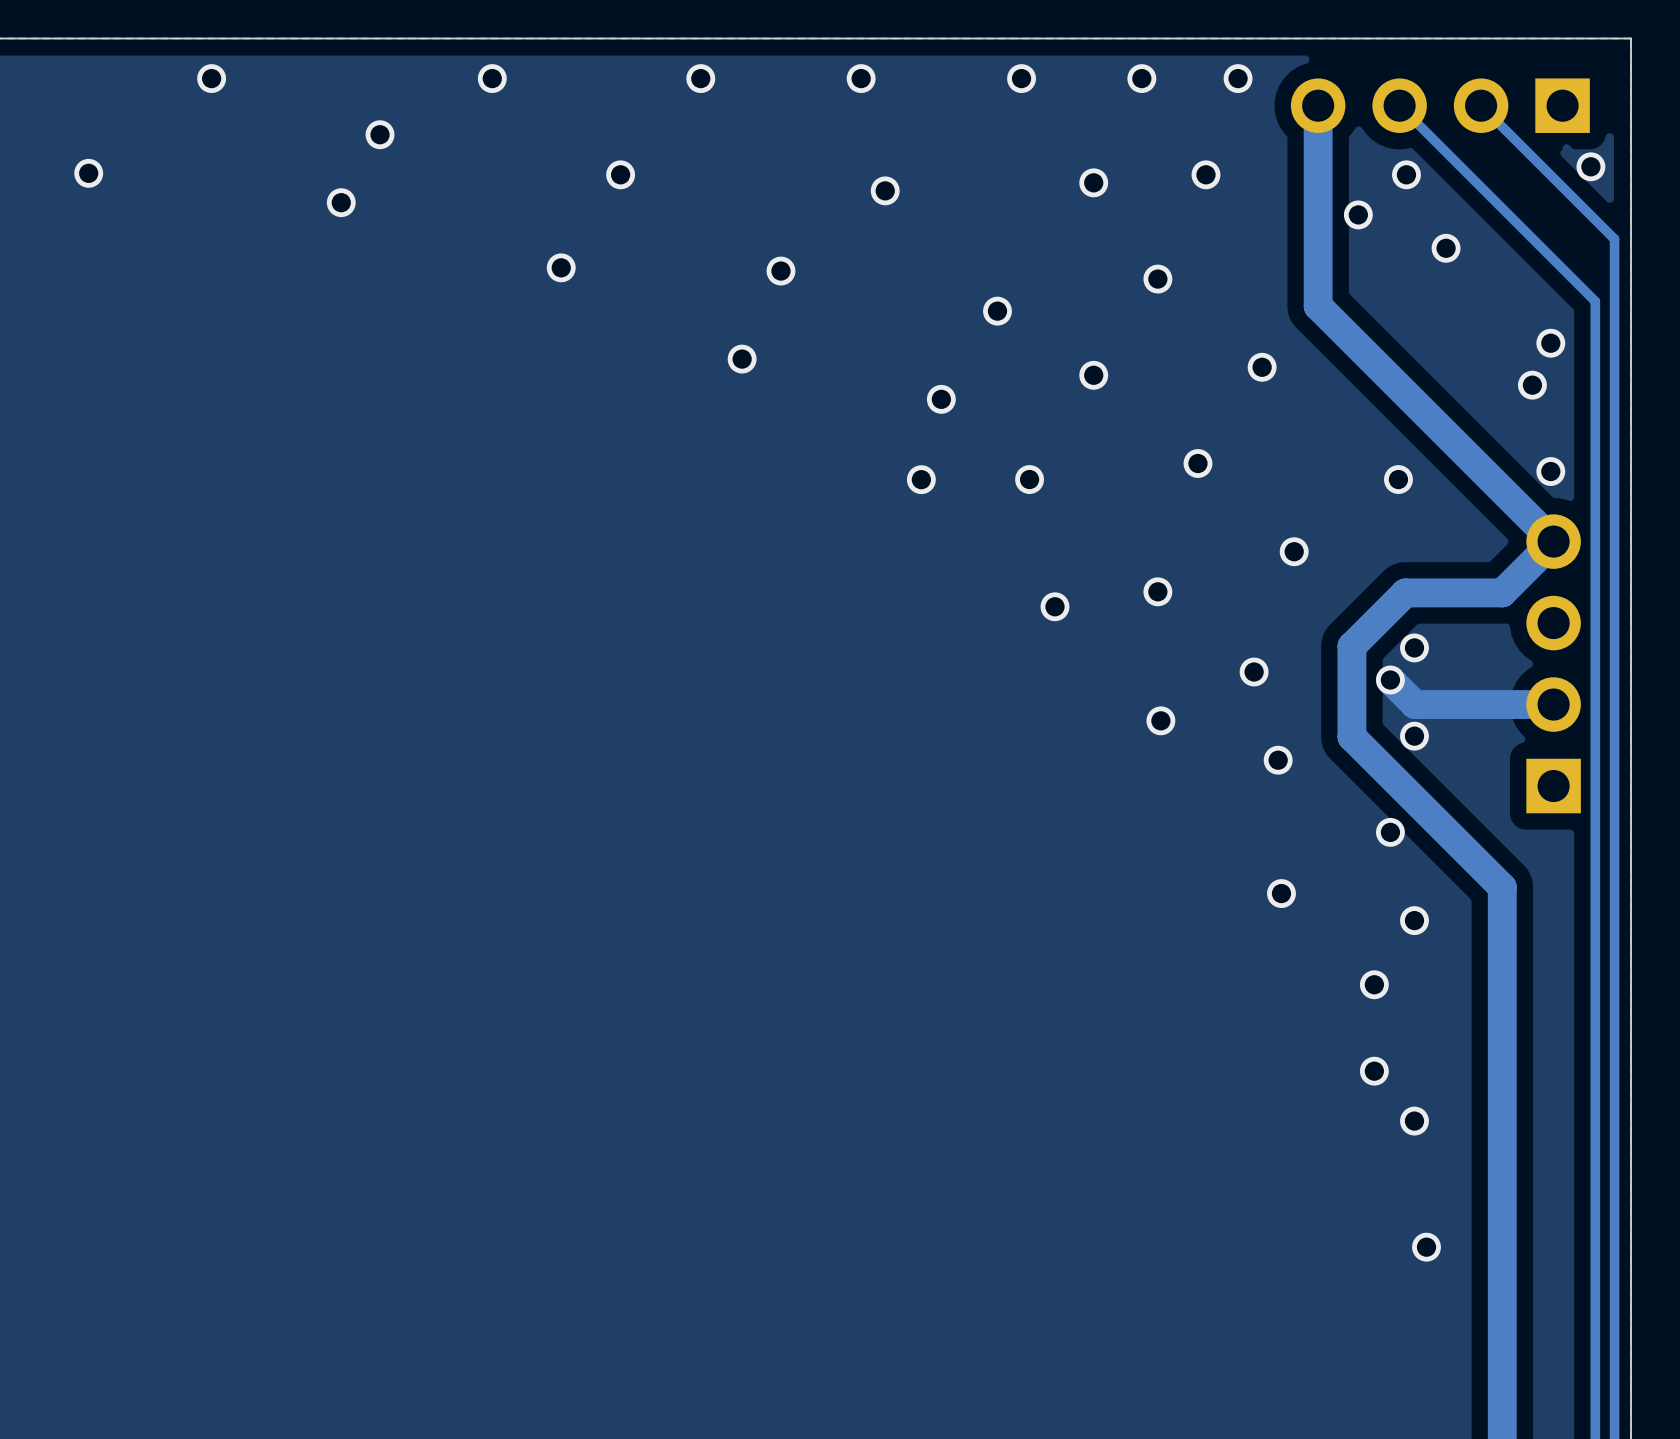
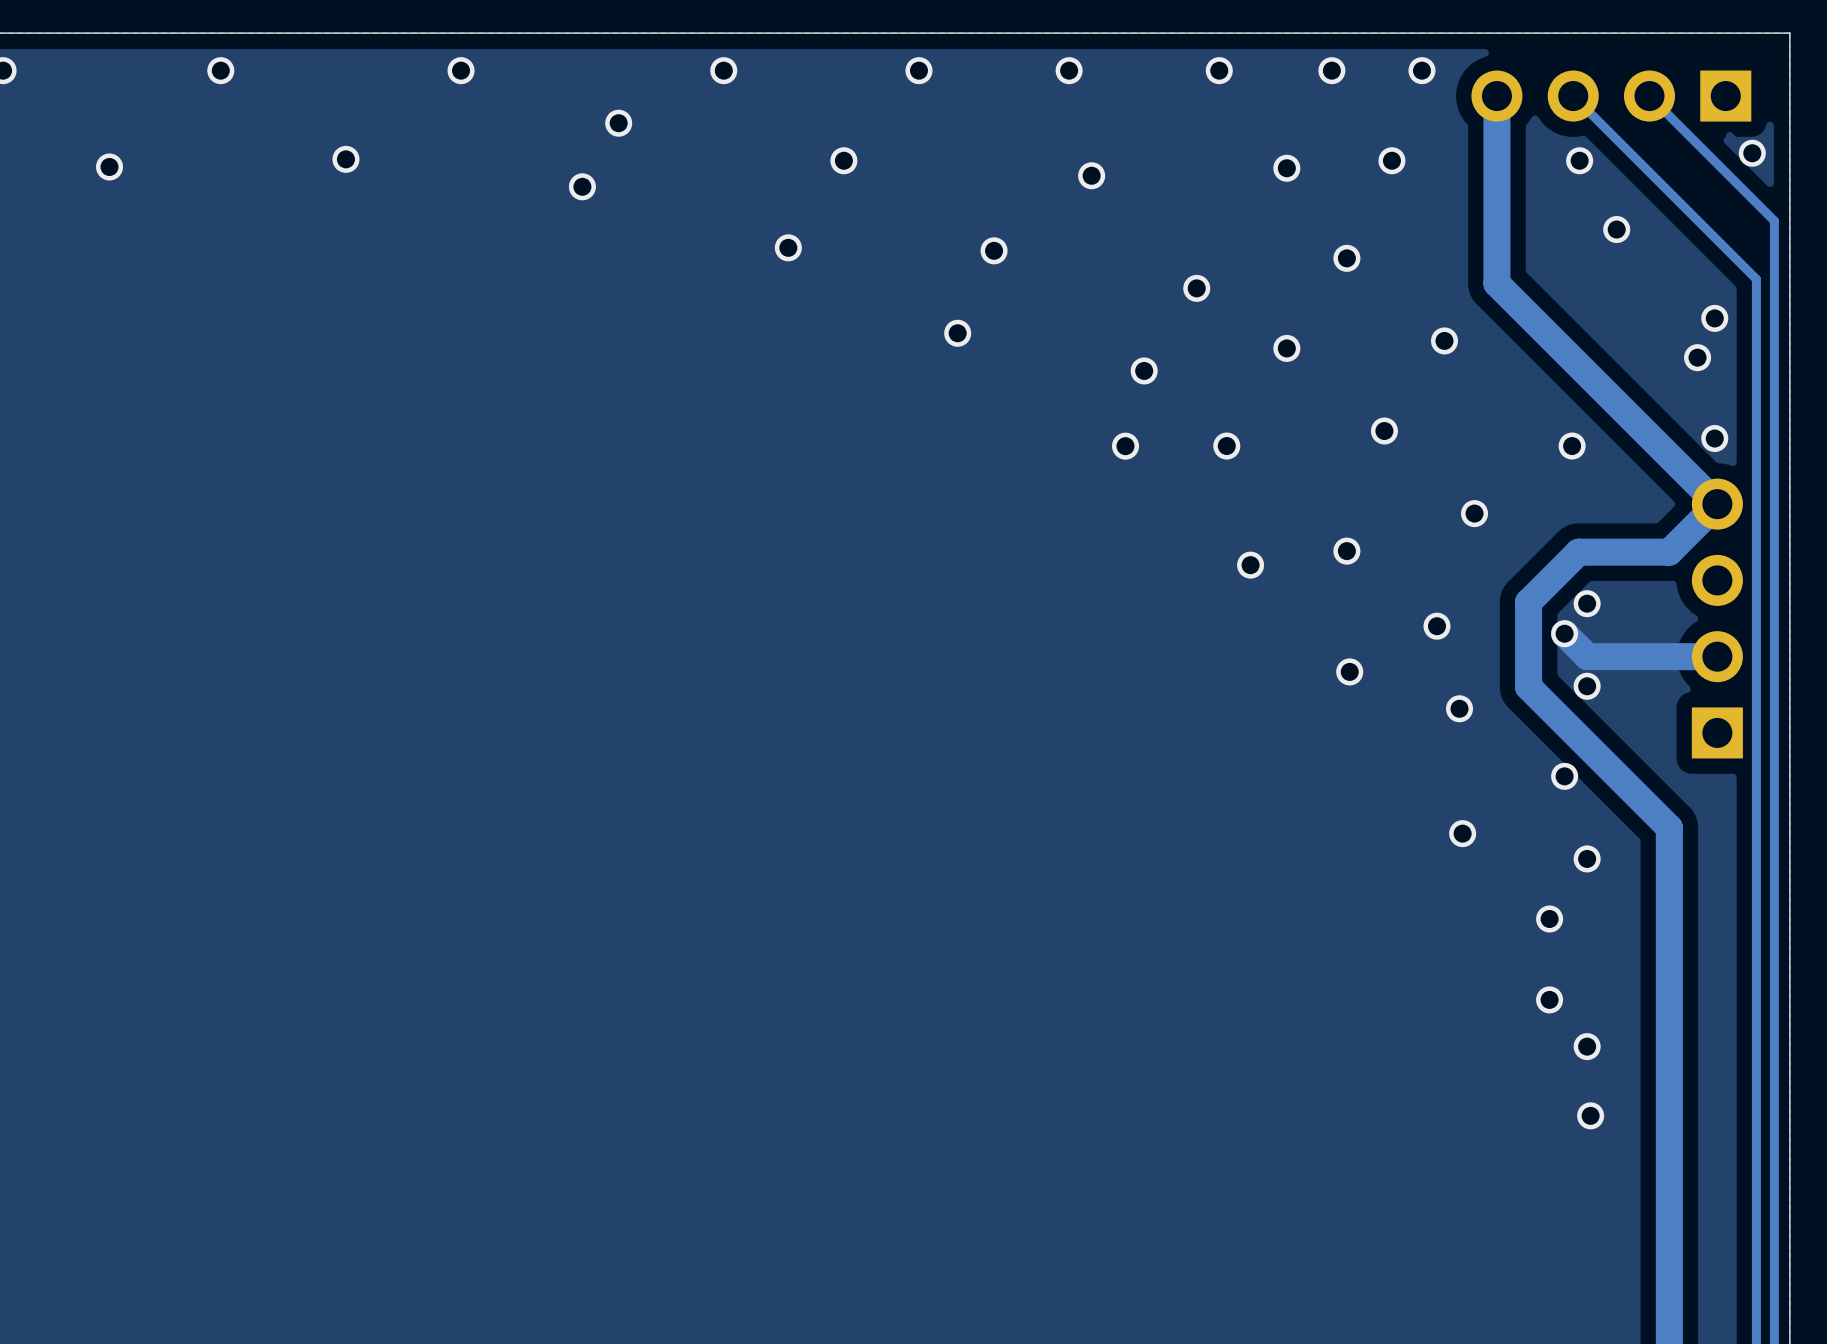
via: (1358, 214) -> none
via position: (1426, 1247) -> (1590, 1115)

